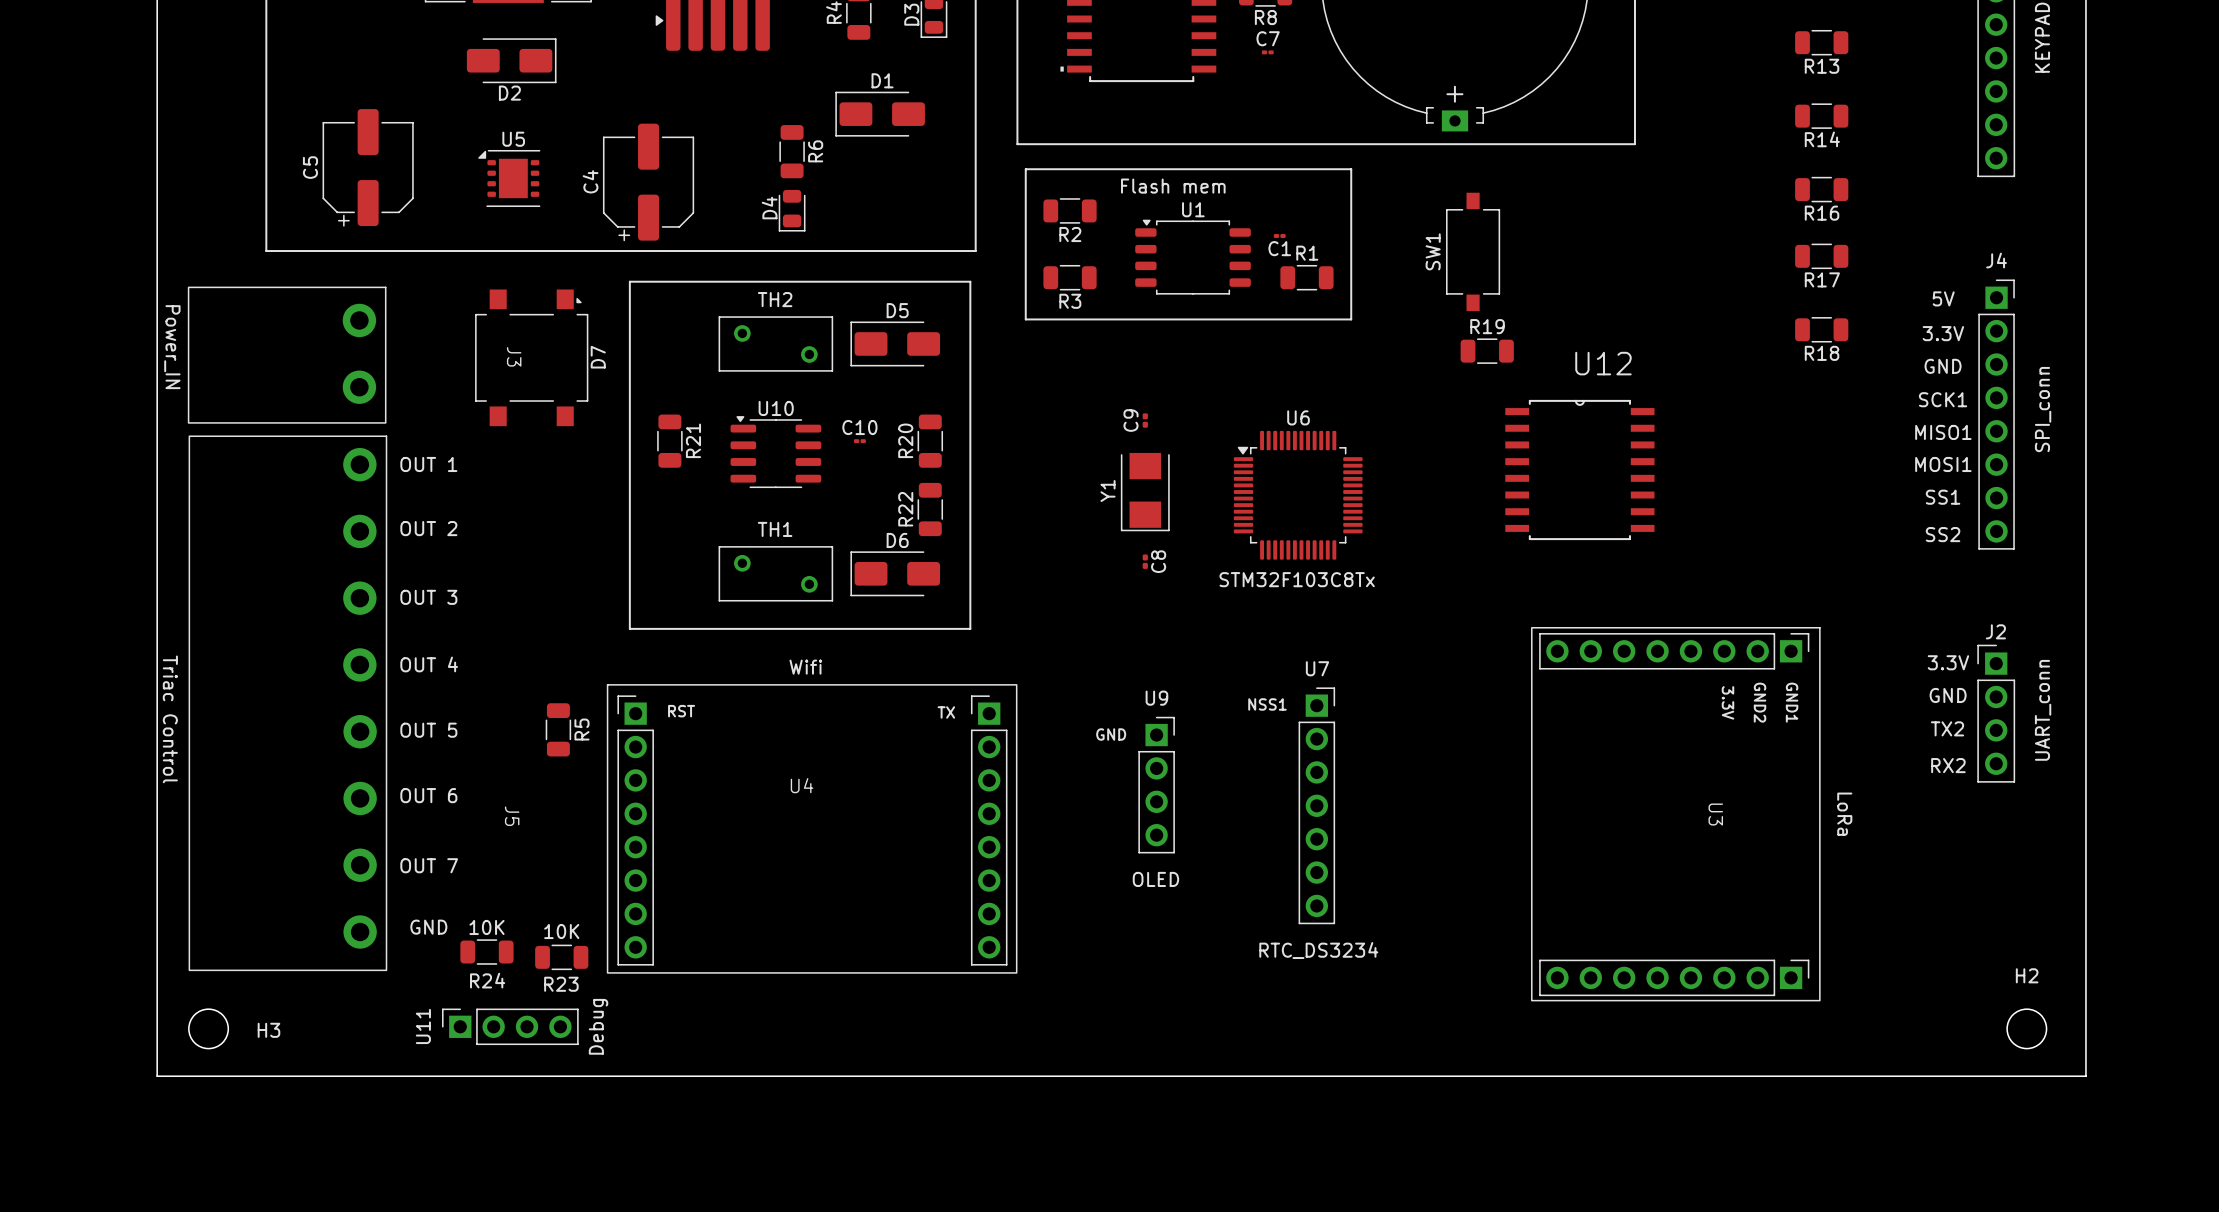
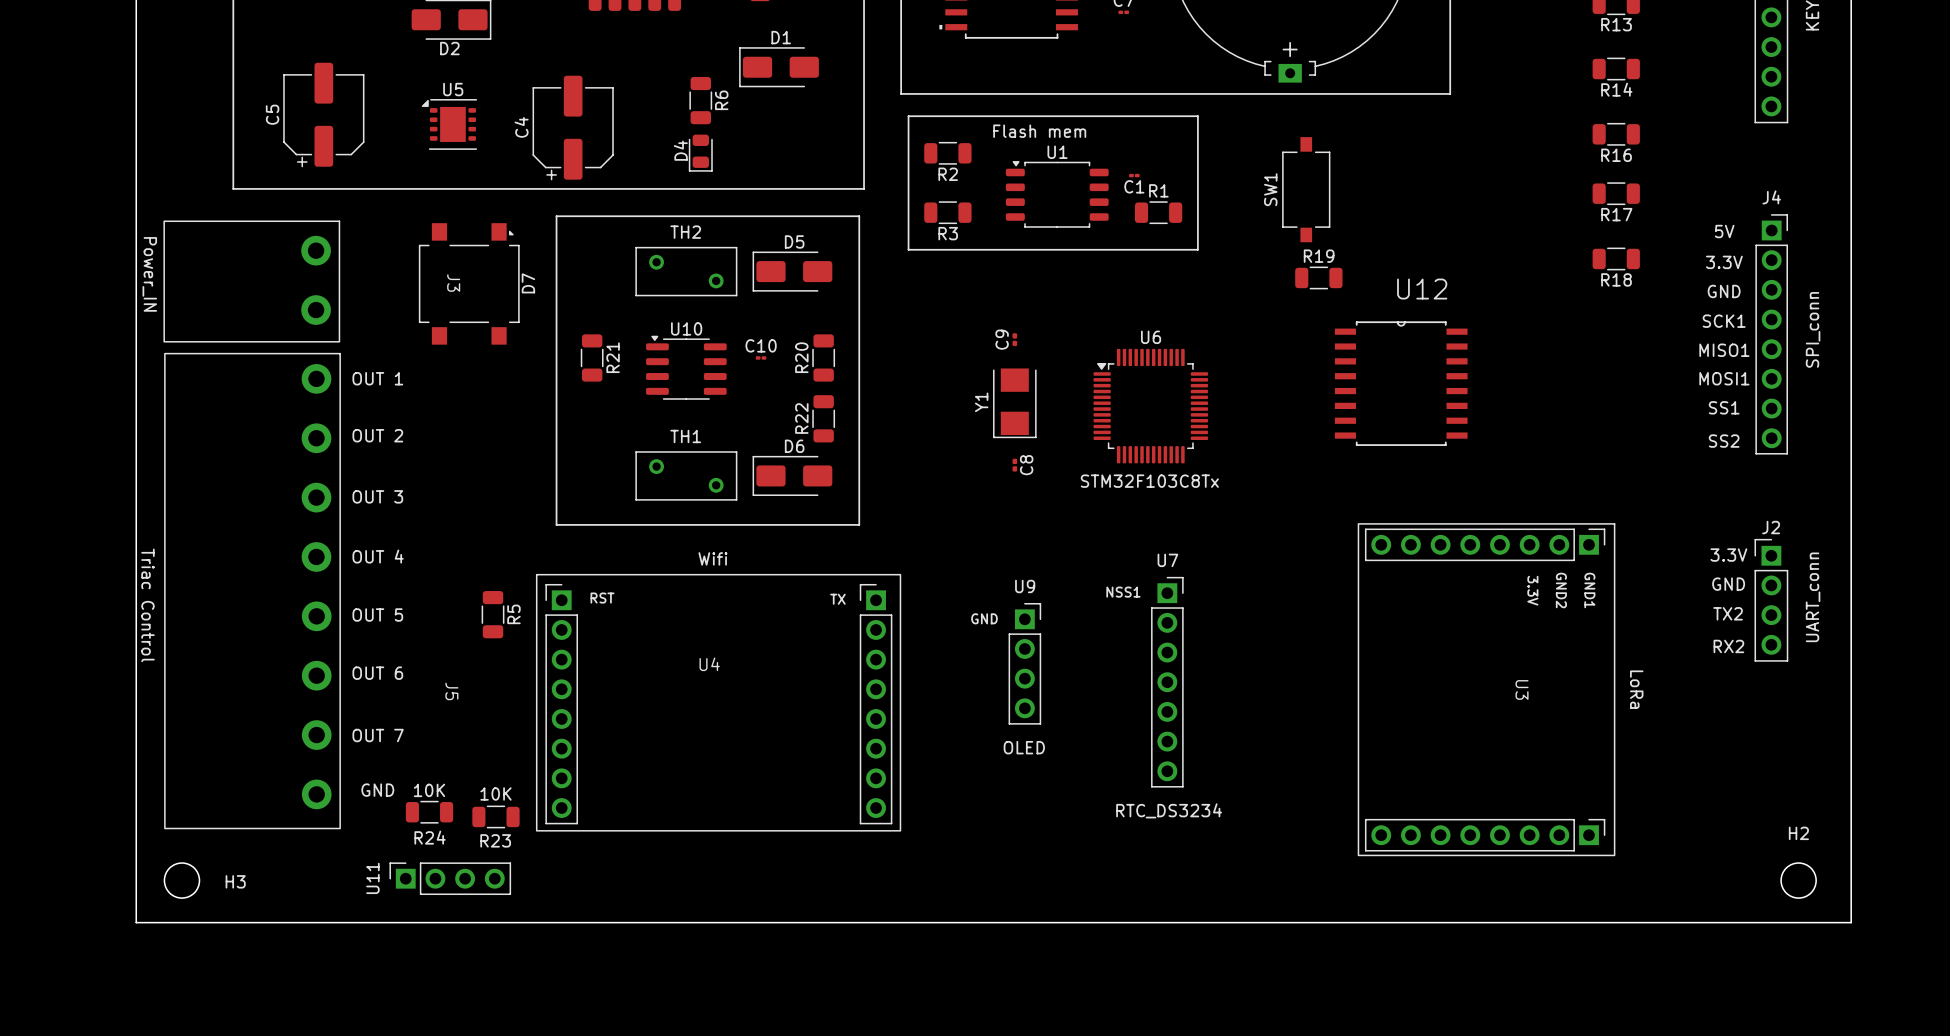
U11 value: Debug (598, 1026) -> none

